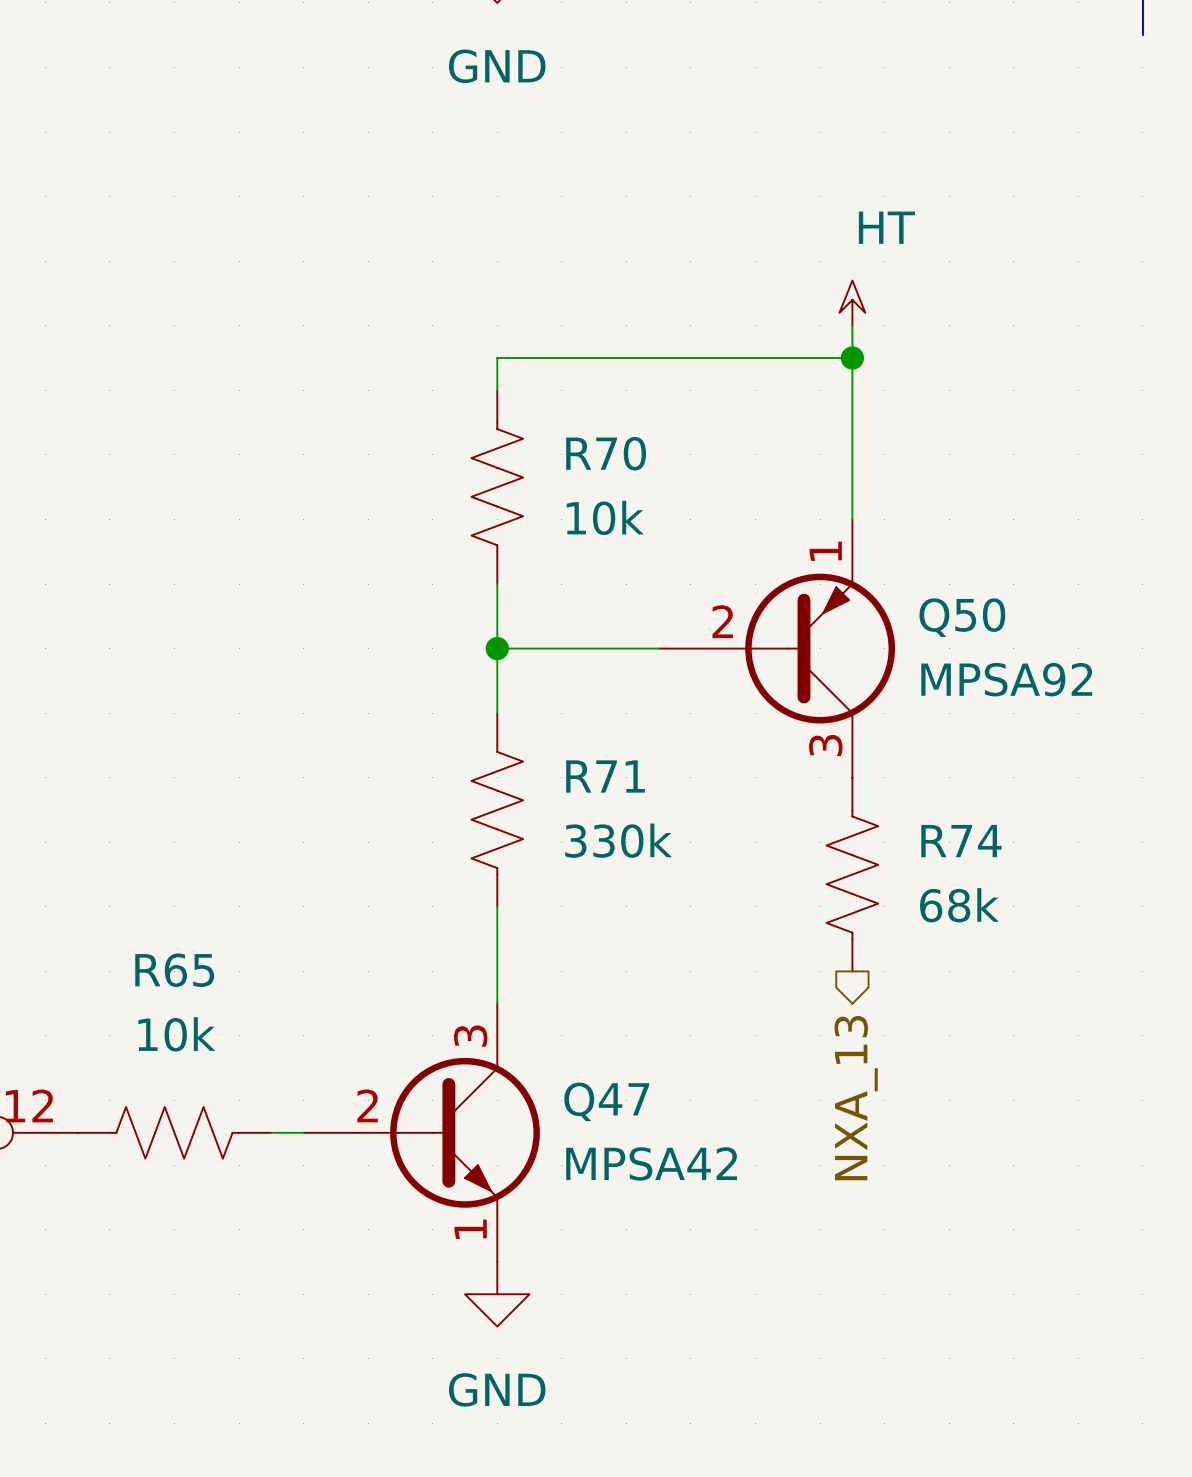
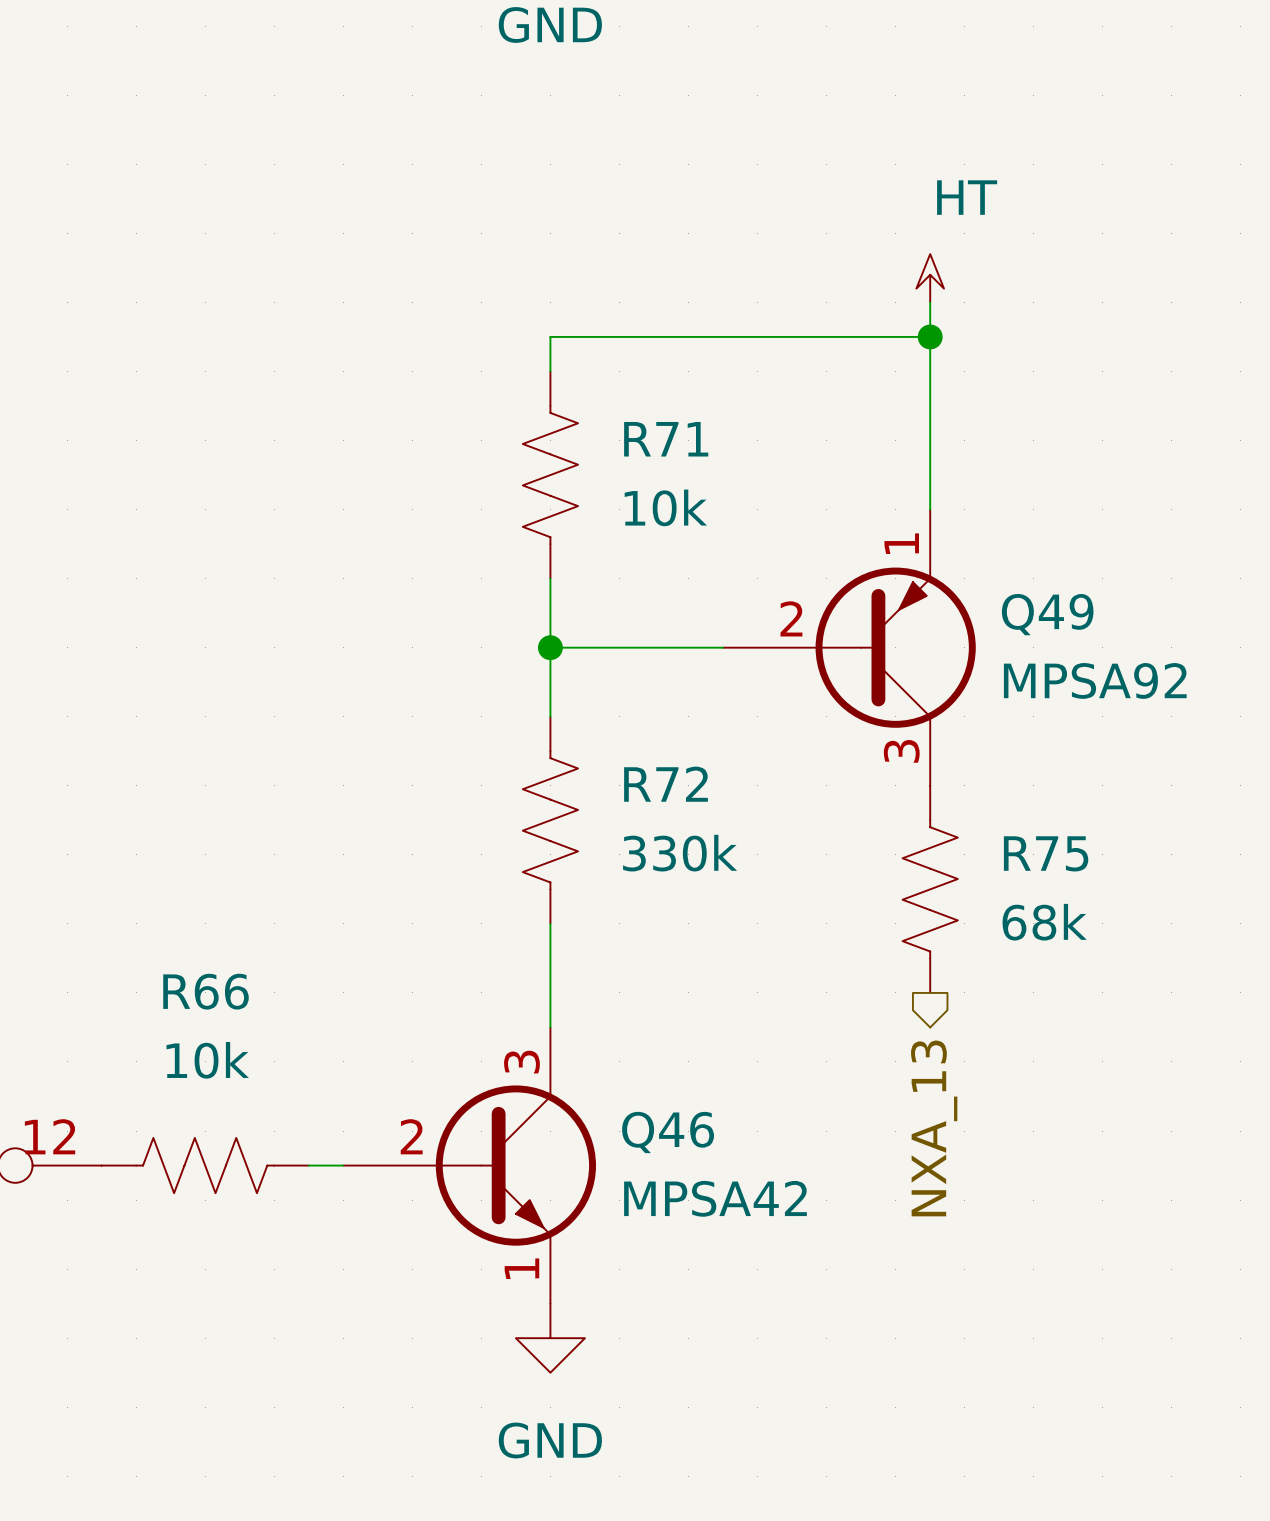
R70 name: R70 (606, 453) -> R71 (666, 439)
Q50 name: Q50 (962, 617) -> Q49 (1047, 614)
R71 name: R71 (605, 776) -> R72 (666, 784)
R74 name: R74 (961, 841) -> R75 (1046, 853)
R65 name: R65 (174, 970) -> R66 (206, 991)
Q47 name: Q47 (606, 1101) -> Q46 (668, 1132)

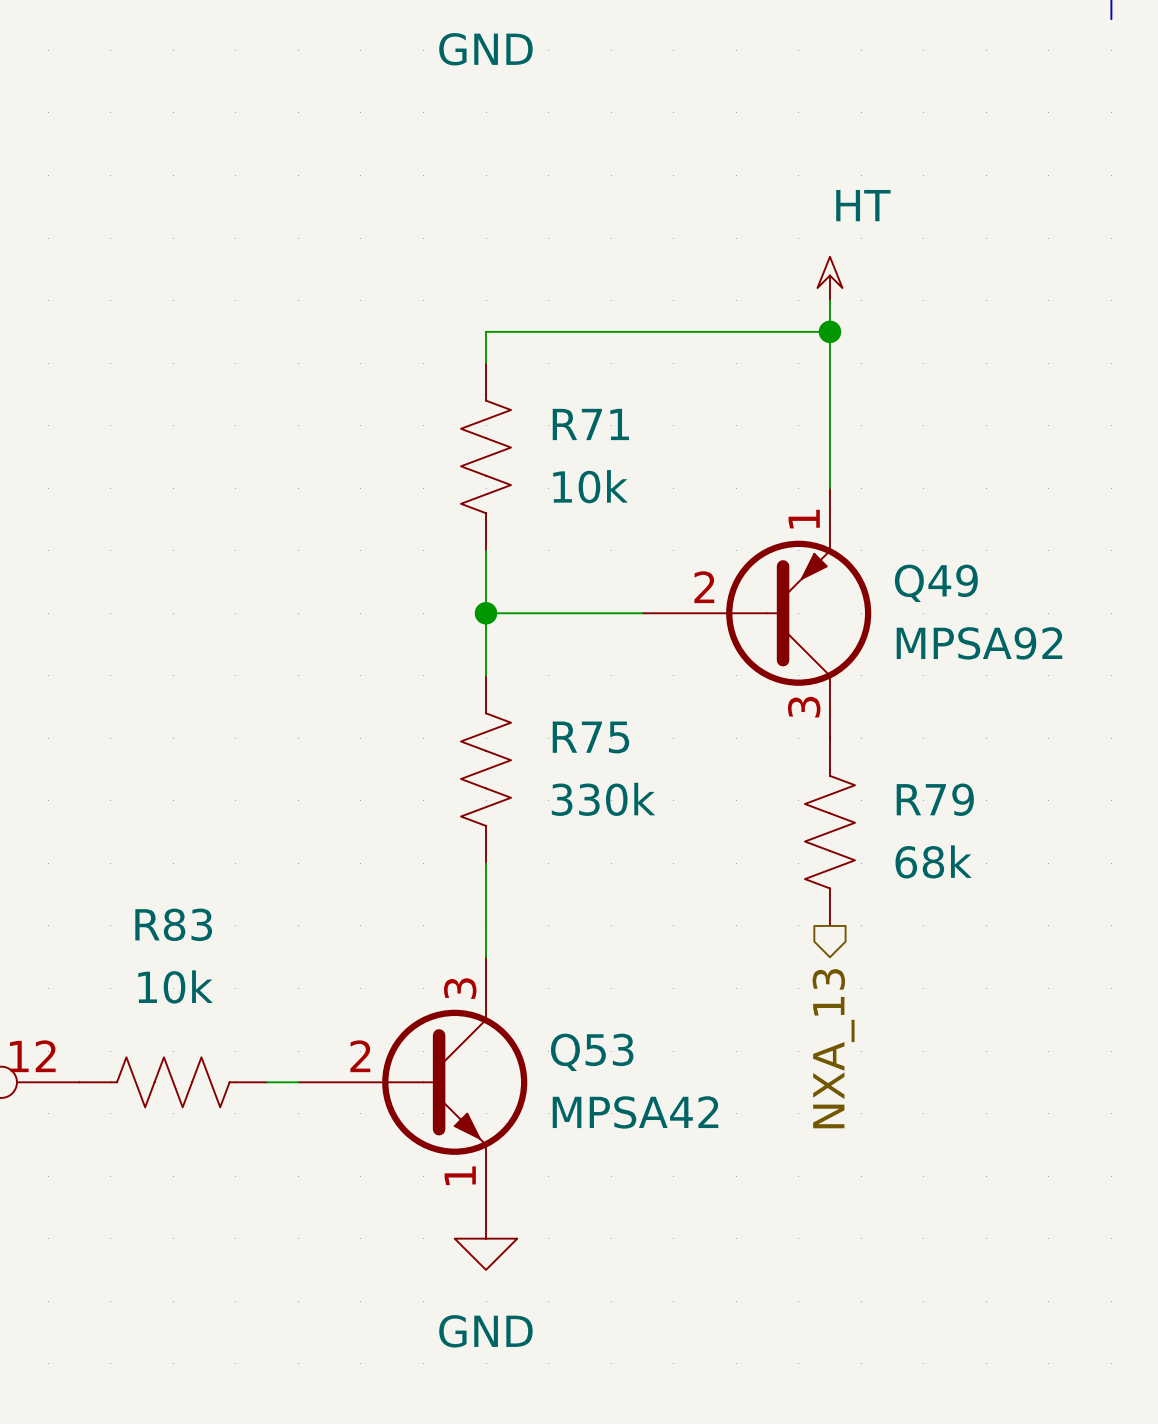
R72 name: R72 (666, 784) -> R75 (590, 737)
R75 name: R75 (1046, 853) -> R79 (935, 799)
R66 name: R66 (206, 991) -> R83 (173, 924)
Q46 name: Q46 (668, 1132) -> Q53 (592, 1052)

